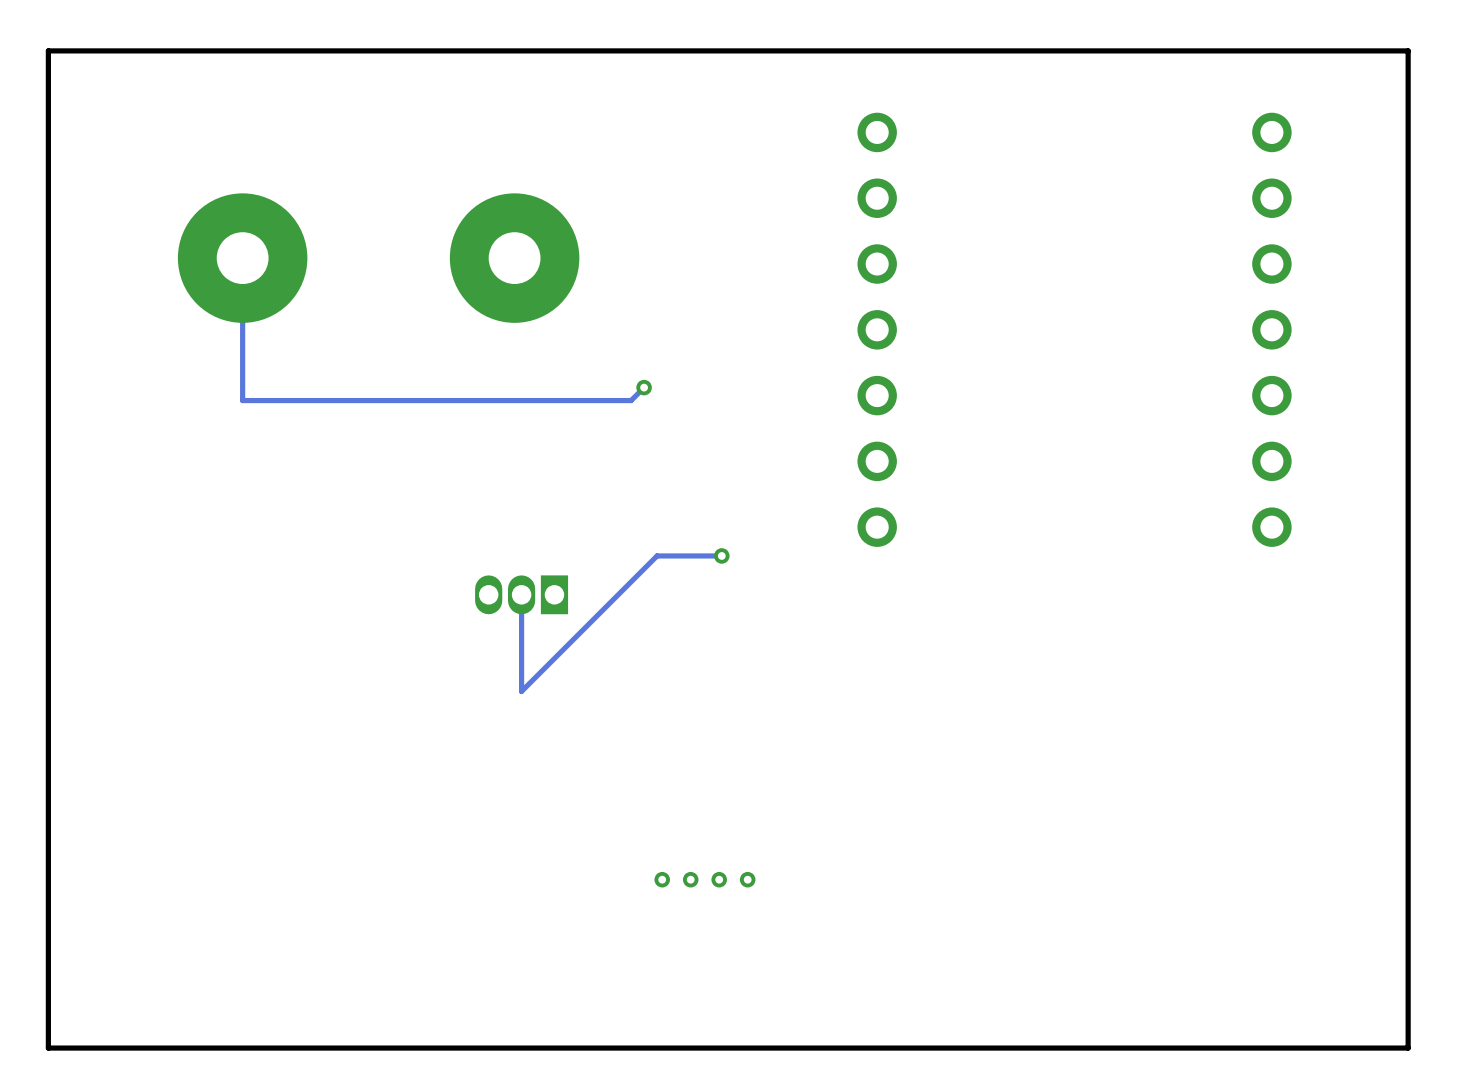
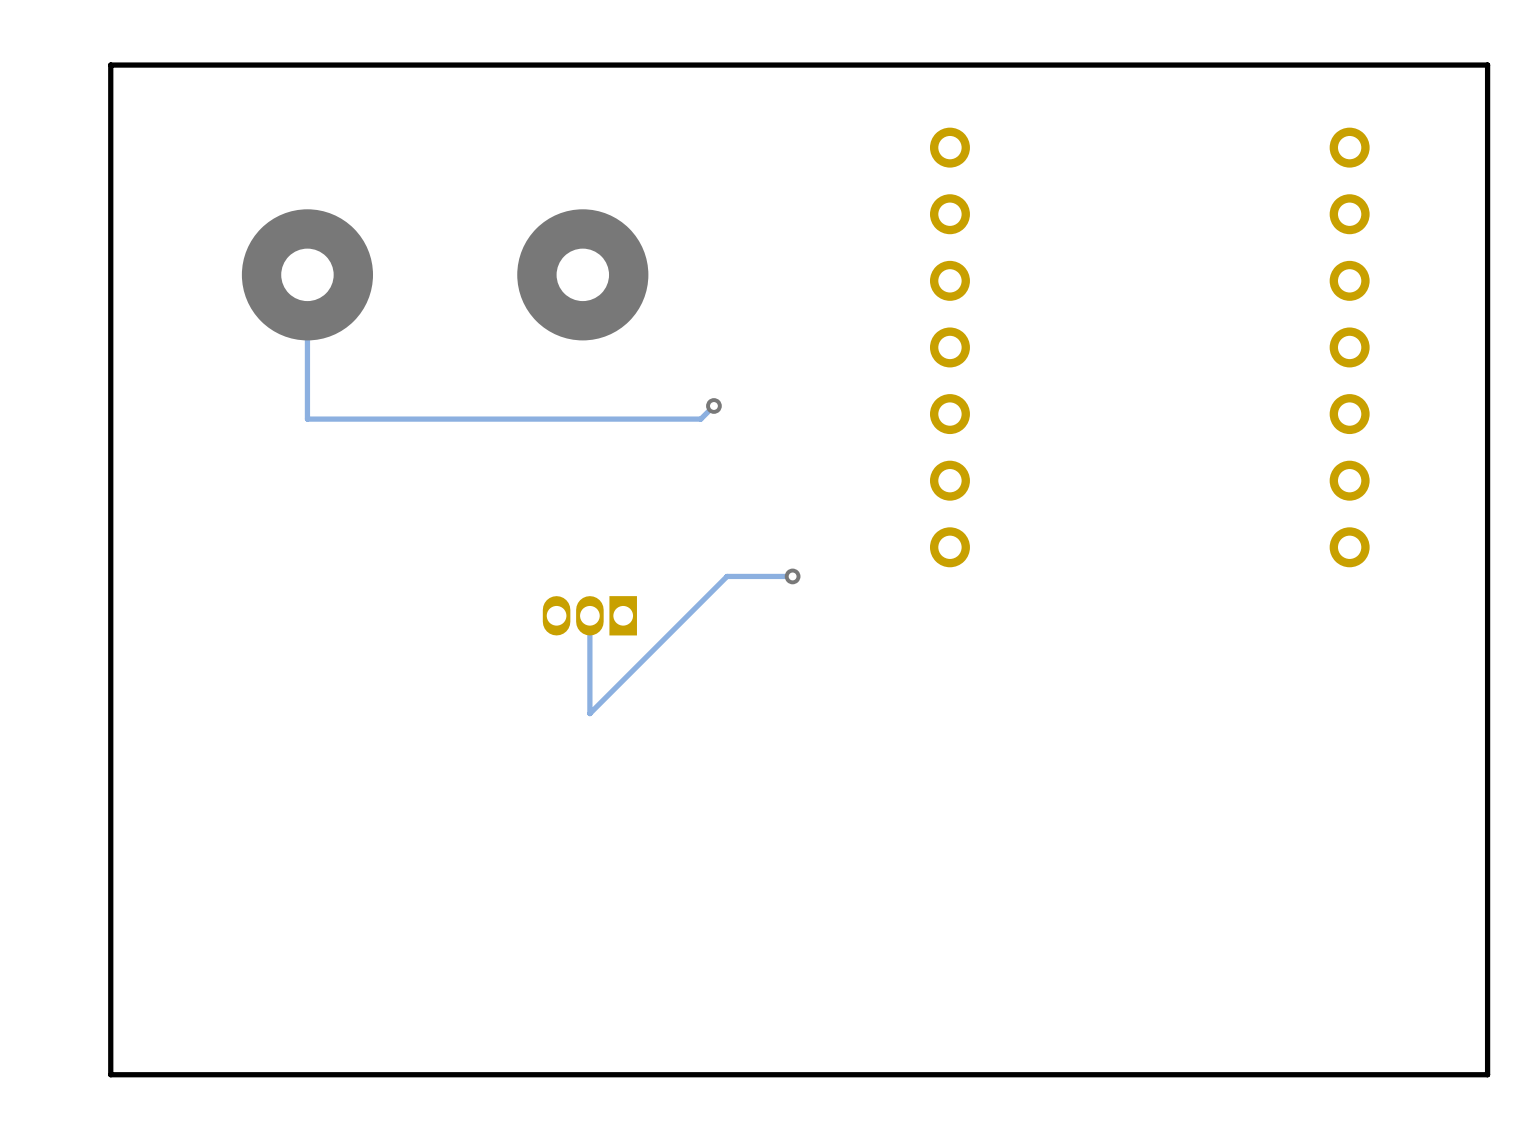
via: (662, 879) -> none
via: (690, 879) -> none
via: (719, 879) -> none
via: (747, 879) -> none

